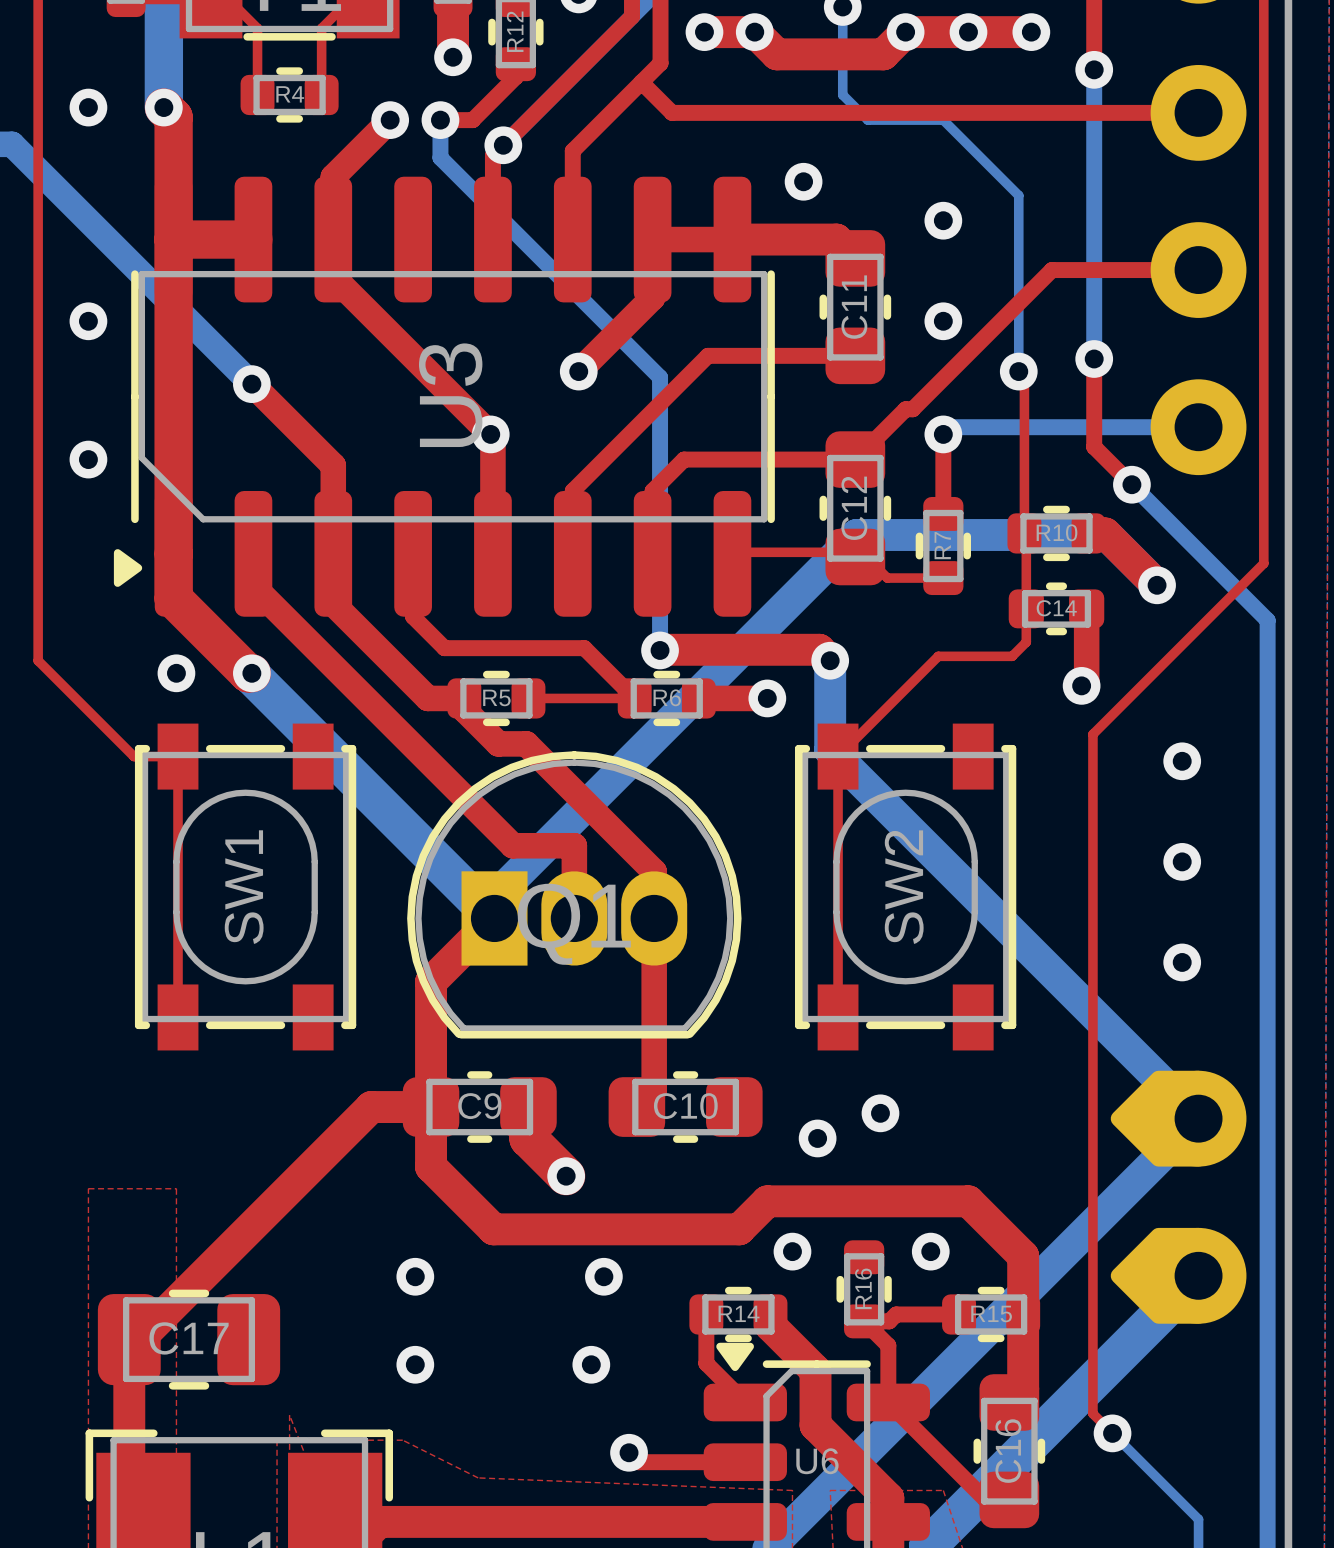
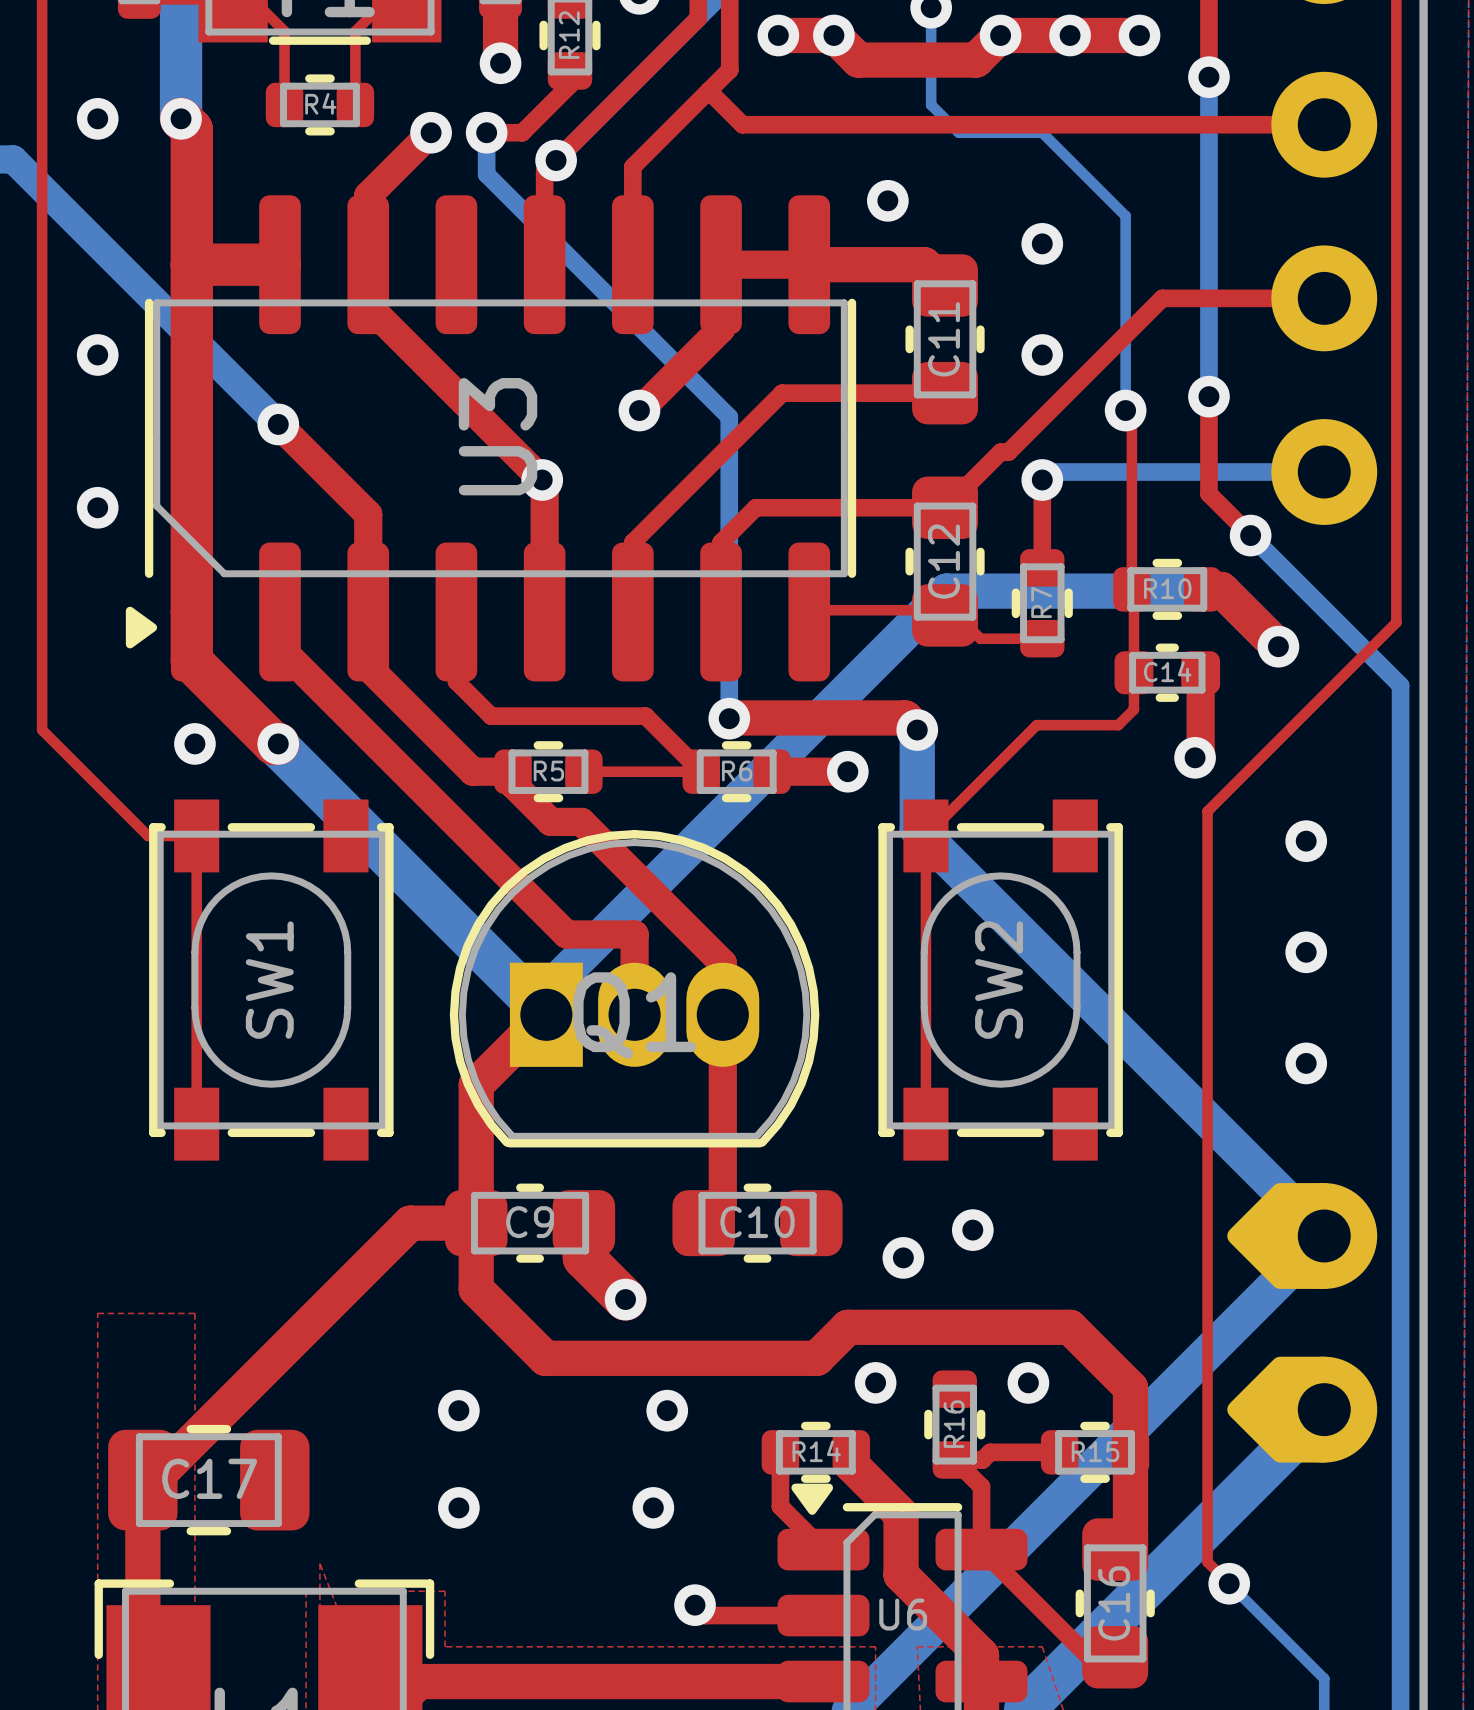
top zone outline: (402, 1440) (478, 1477) (792, 1490) -> (444, 1591) (444, 1646) (875, 1646)

